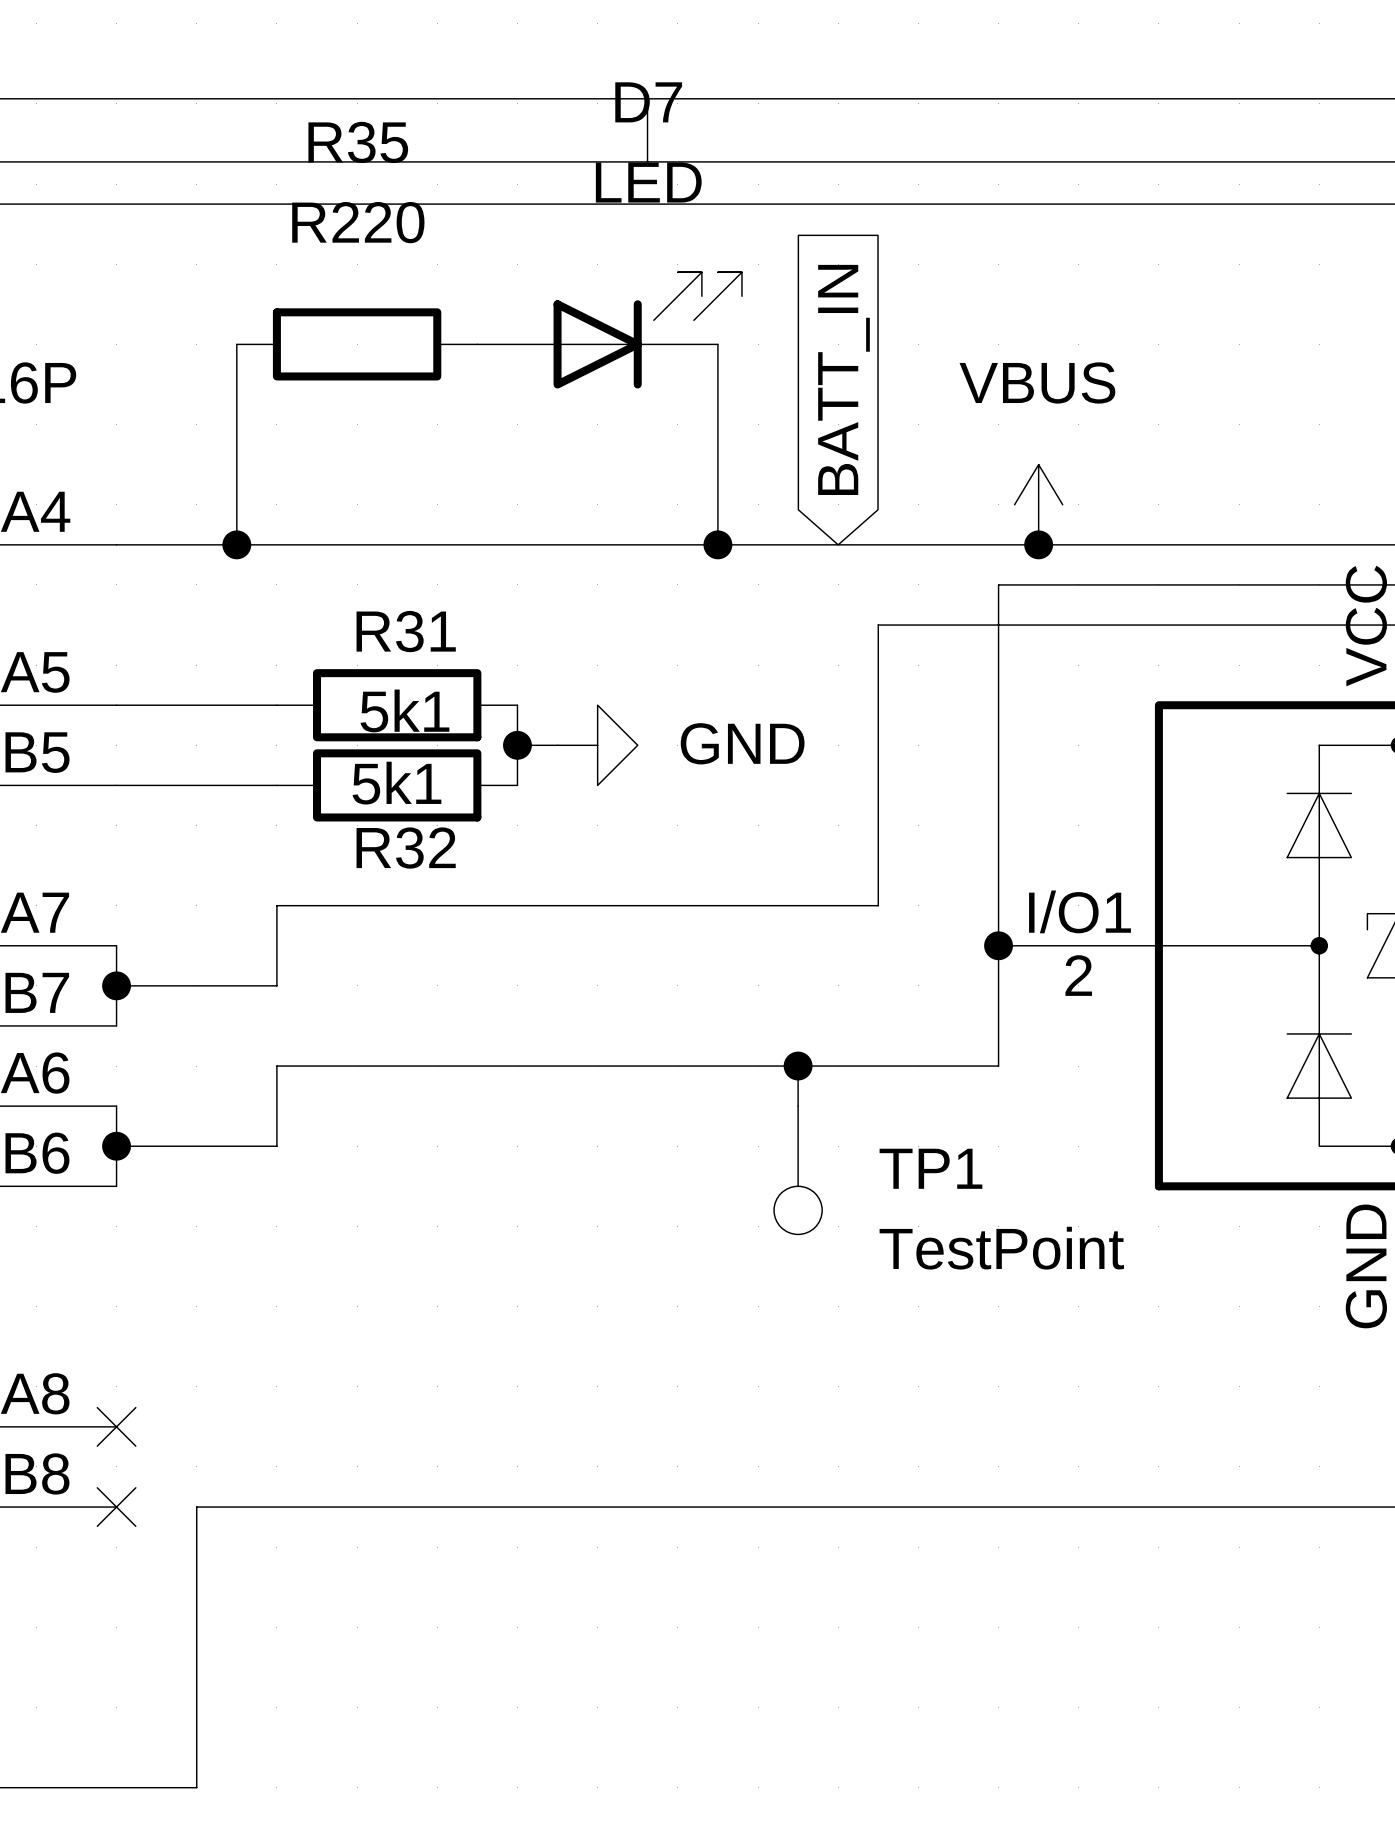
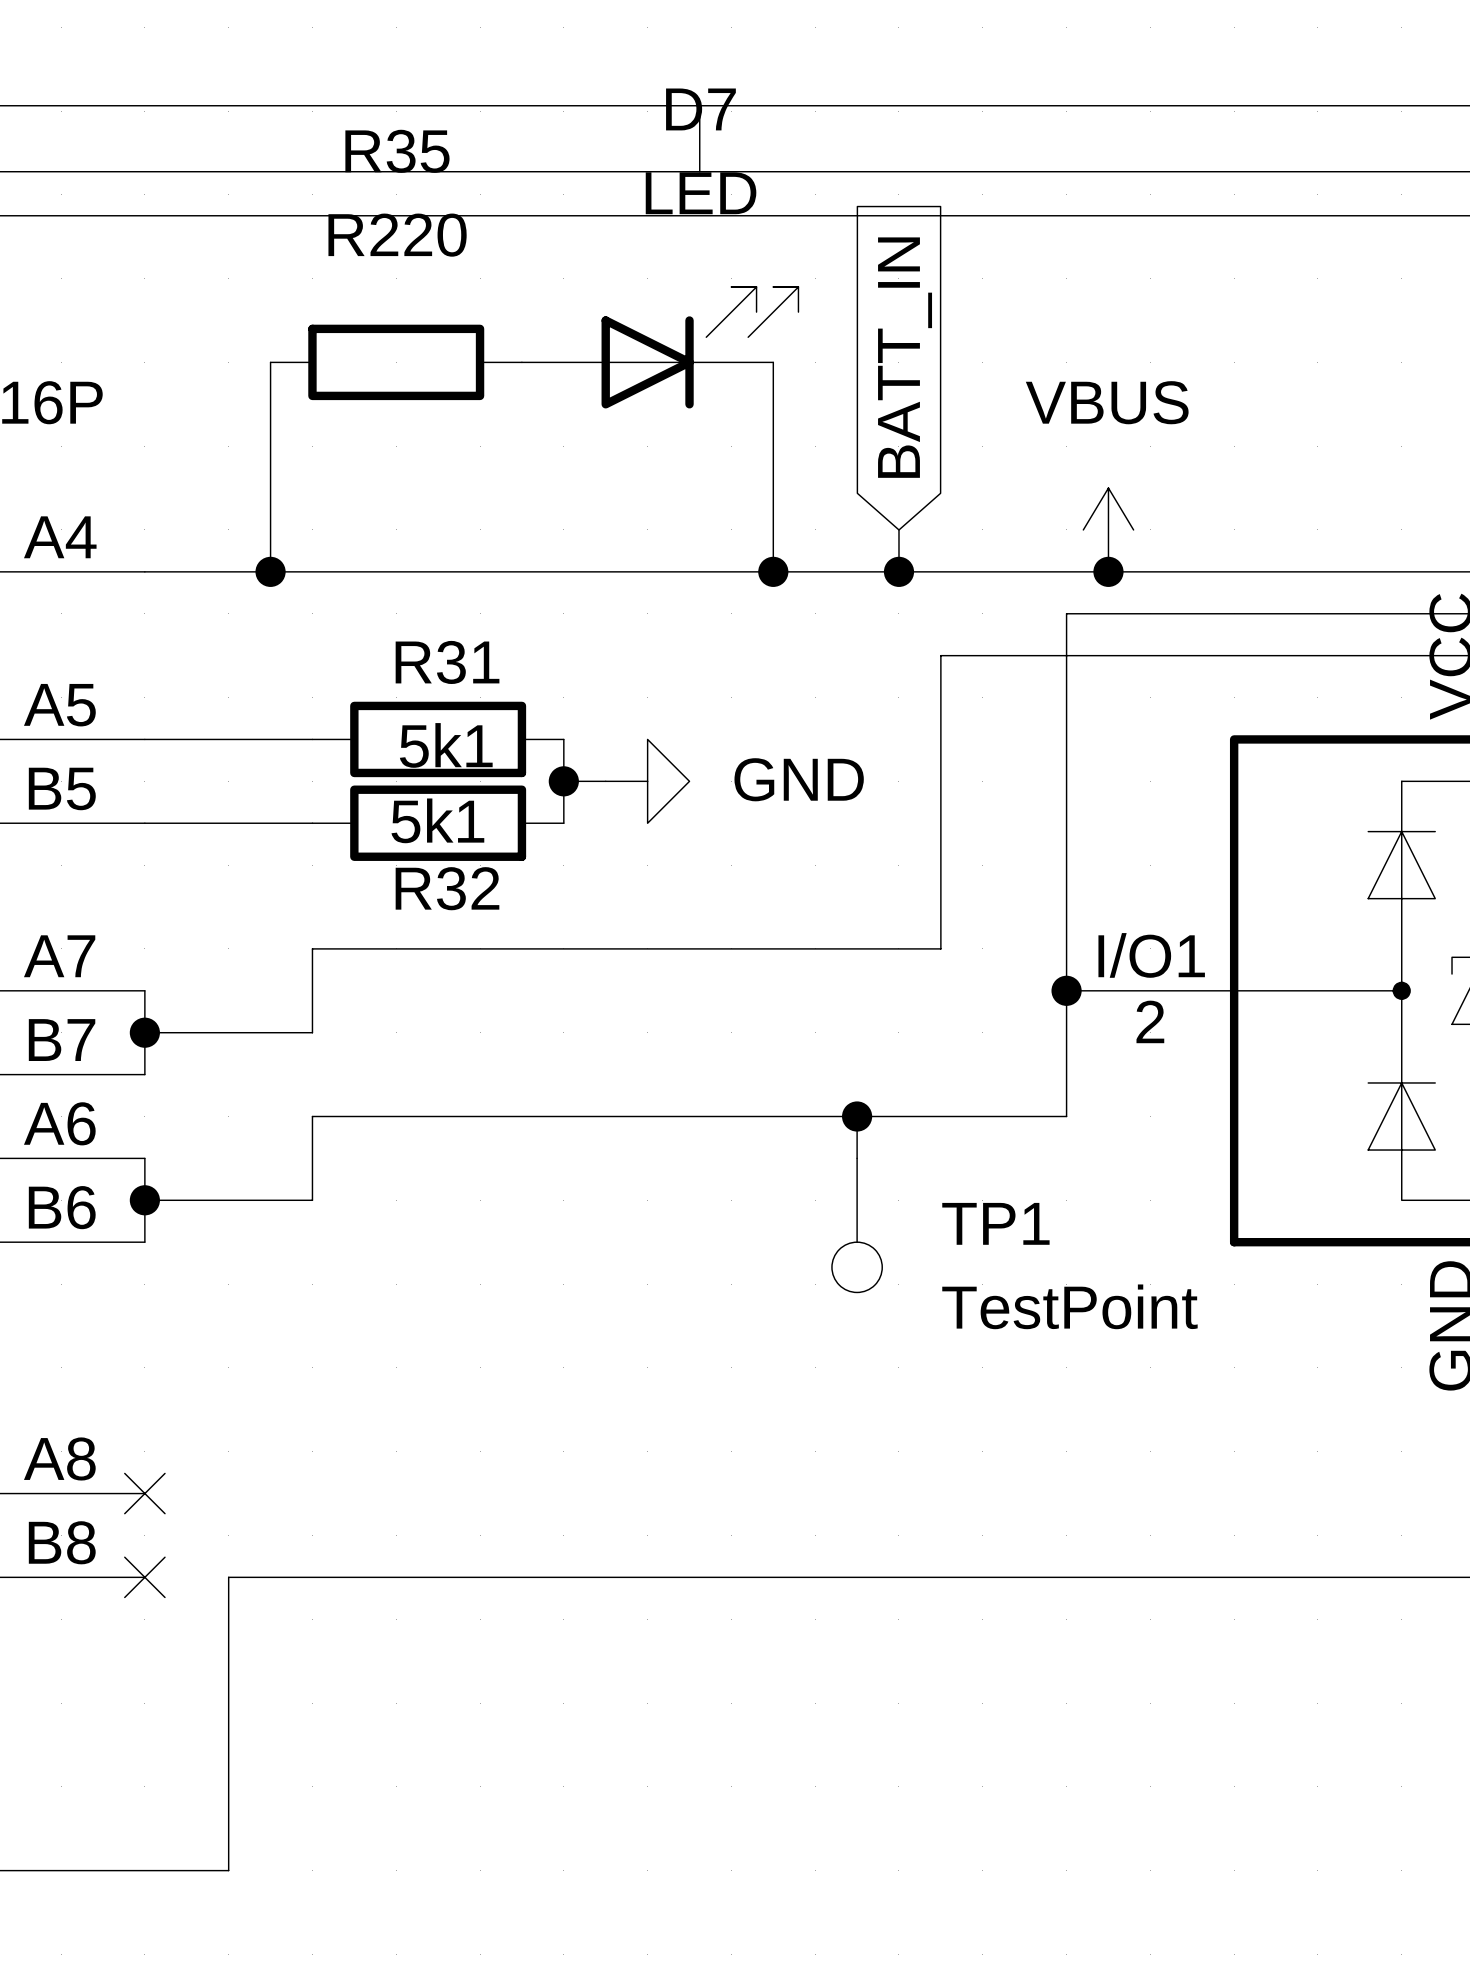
global label position: BATT_IN (843, 379) -> BATT_IN (905, 357)
wire: none -> (898, 529) (898, 571)
junction: none -> (898, 571)

